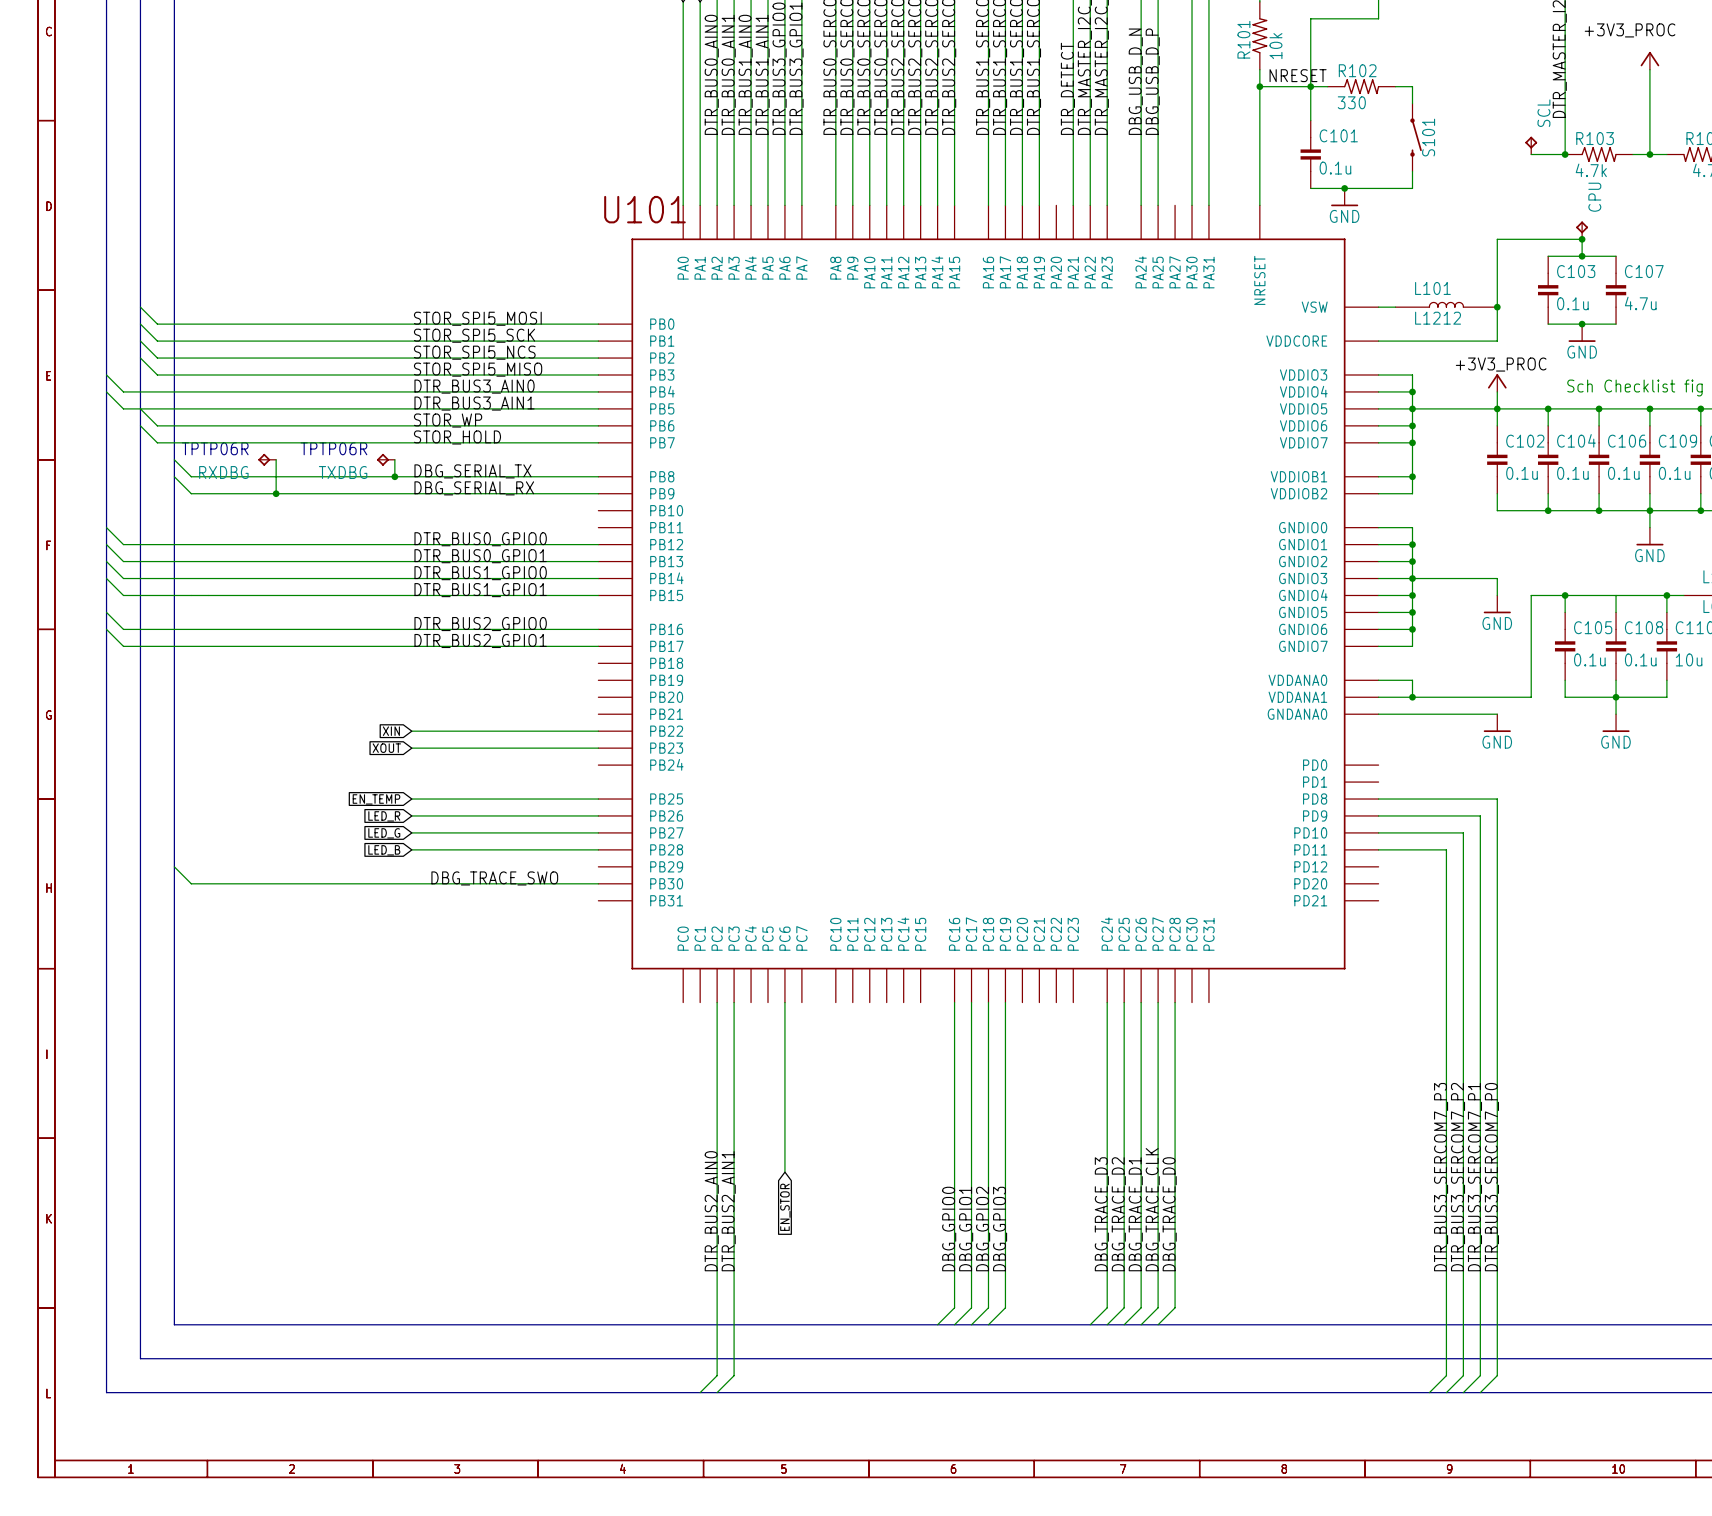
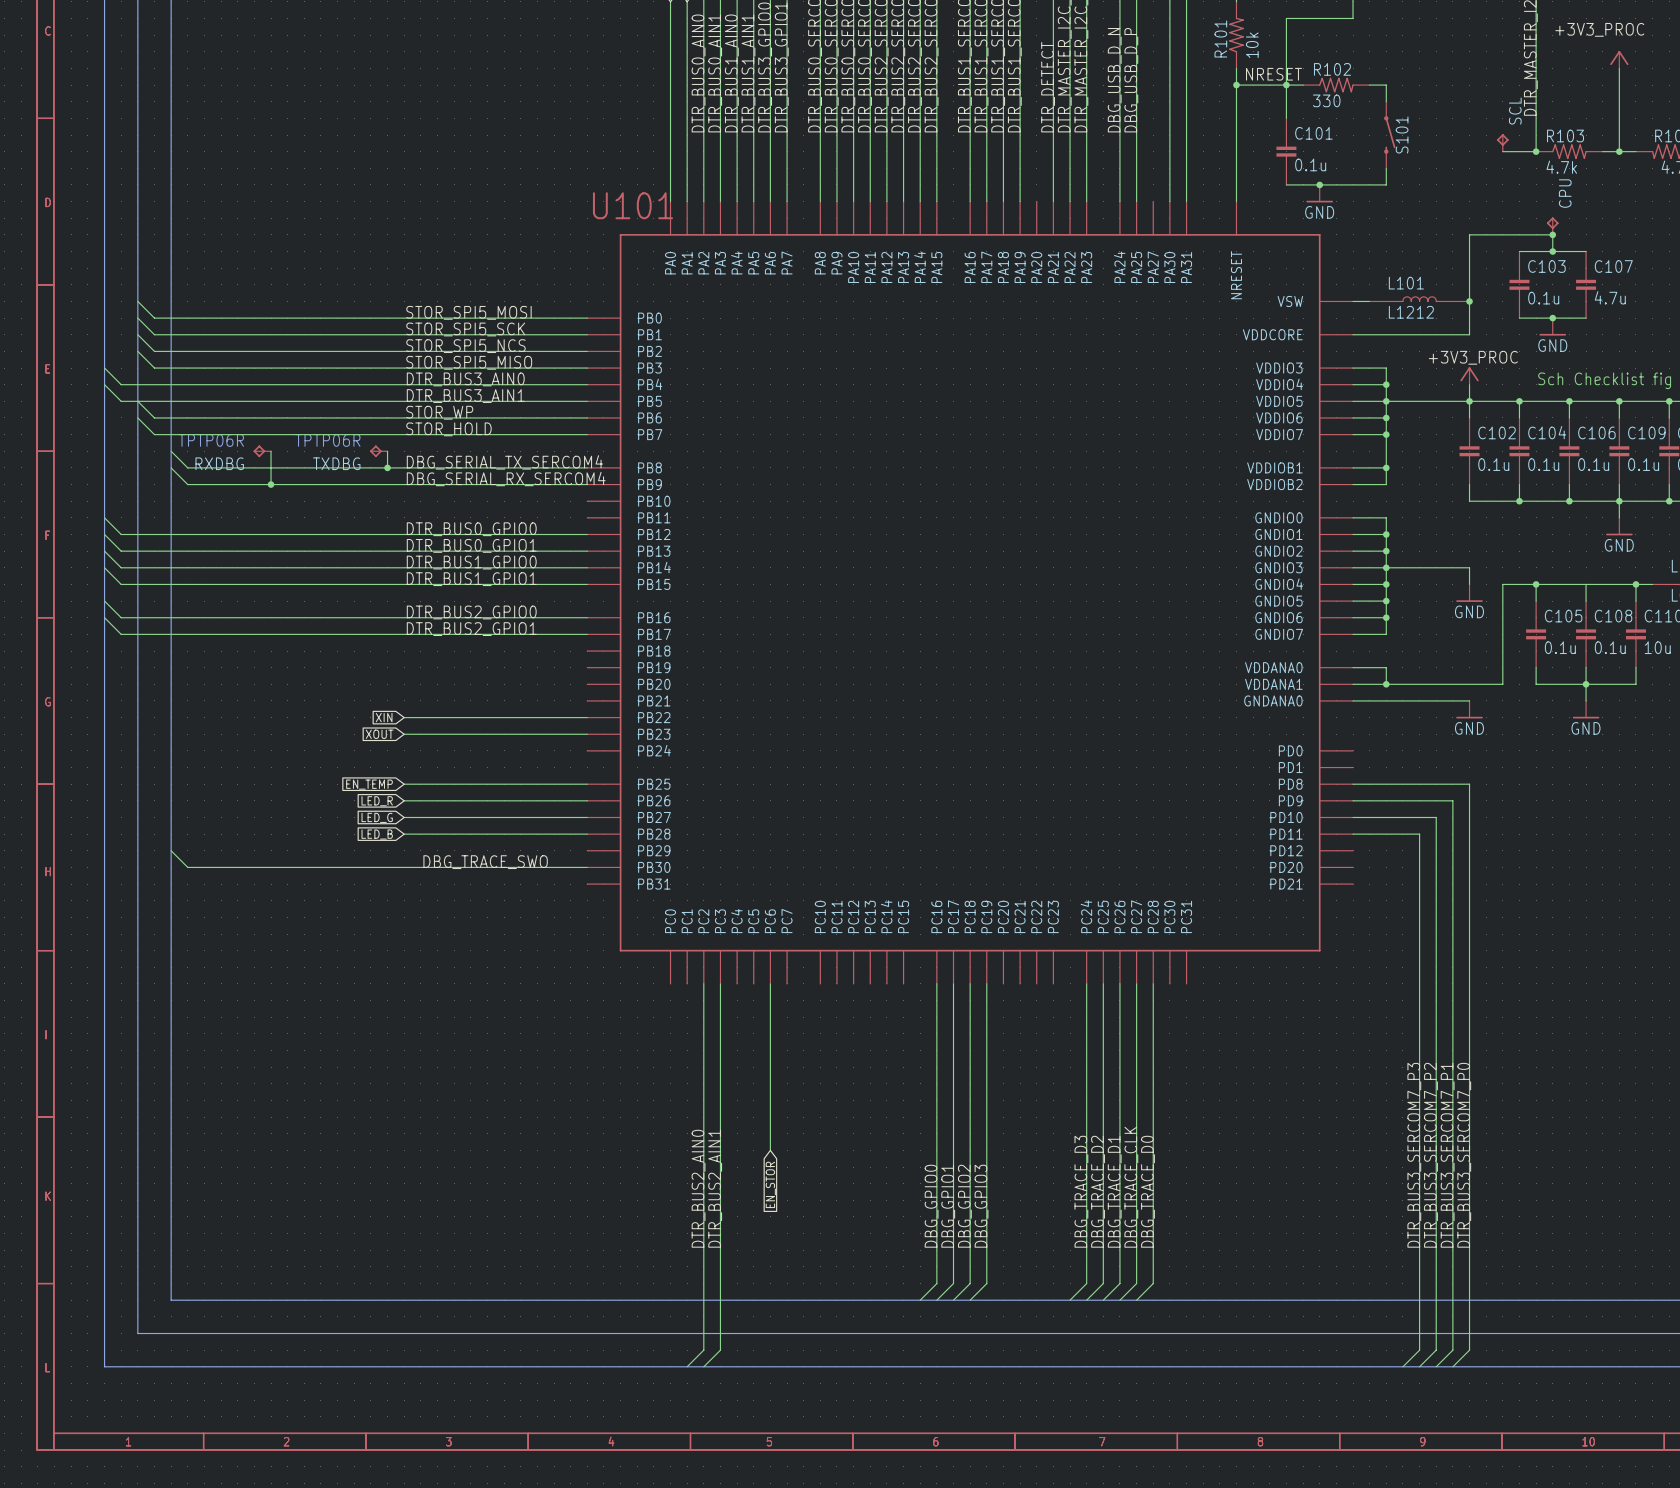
label: DBG_SERIAL_TX (473, 471) -> DBG_SERIAL_TX_SERCOM4 (504, 462)
label: DBG_SERIAL_RX (474, 488) -> DBG_SERIAL_RX_SERCOM4 (506, 479)

